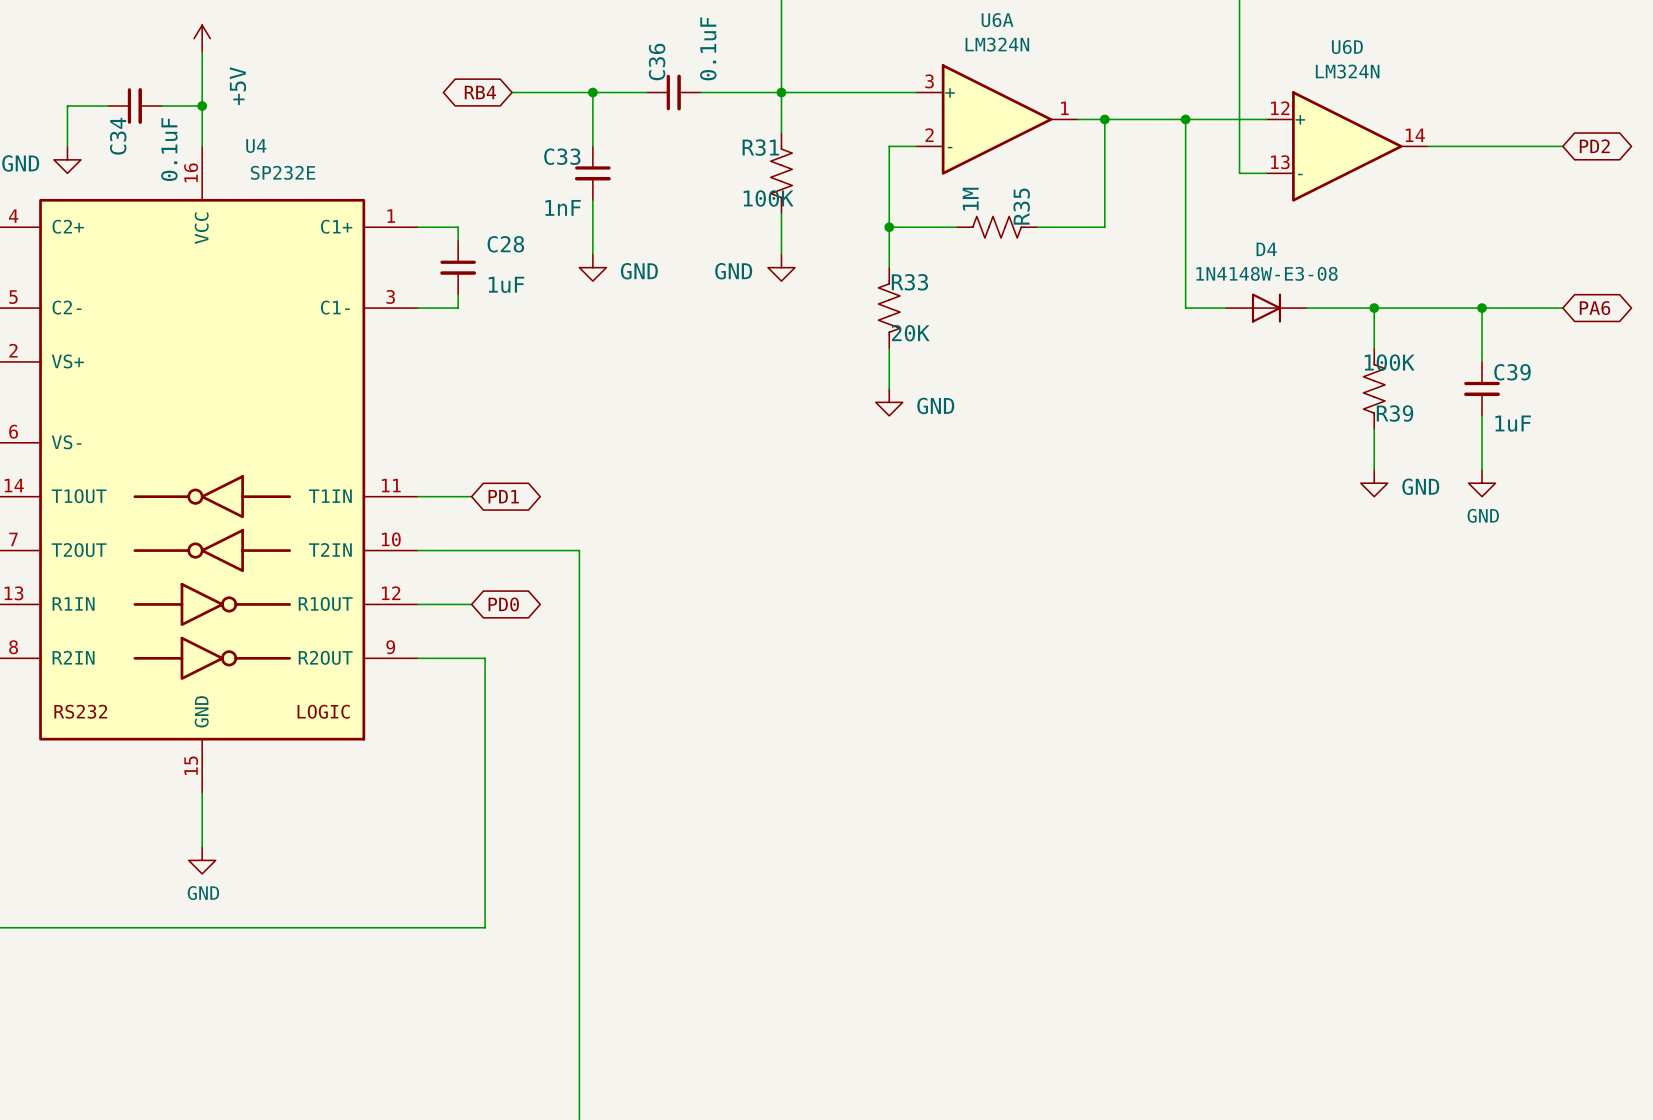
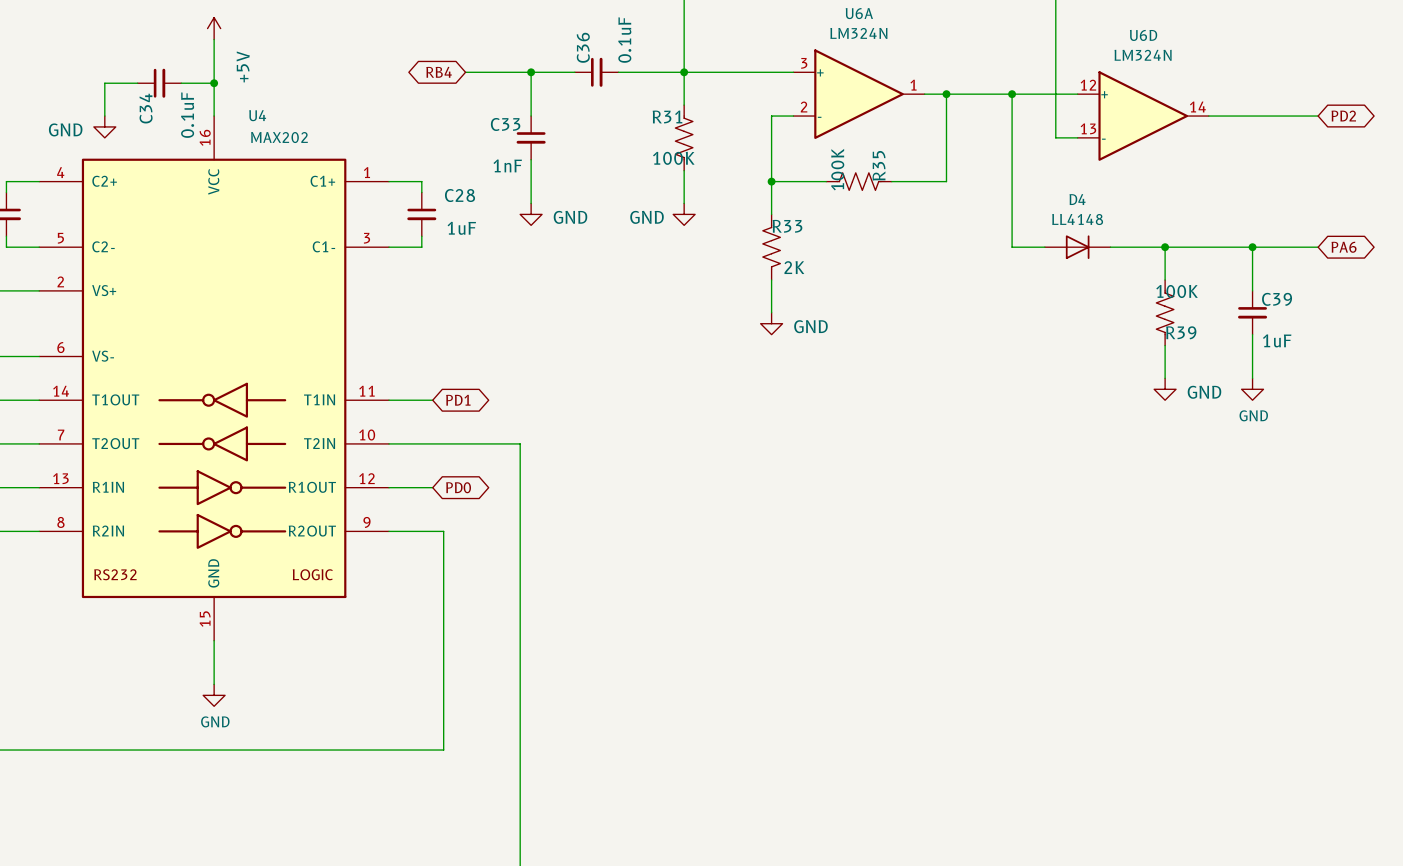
U4 value: SP232E (283, 172) -> MAX202 (279, 137)
R35 value: 1M (970, 199) -> 100K (837, 169)
D4 value: 1N4148W-E3-08 (1266, 273) -> LL4148 (1077, 219)
R33 value: 20K (910, 333) -> 2K (794, 267)

